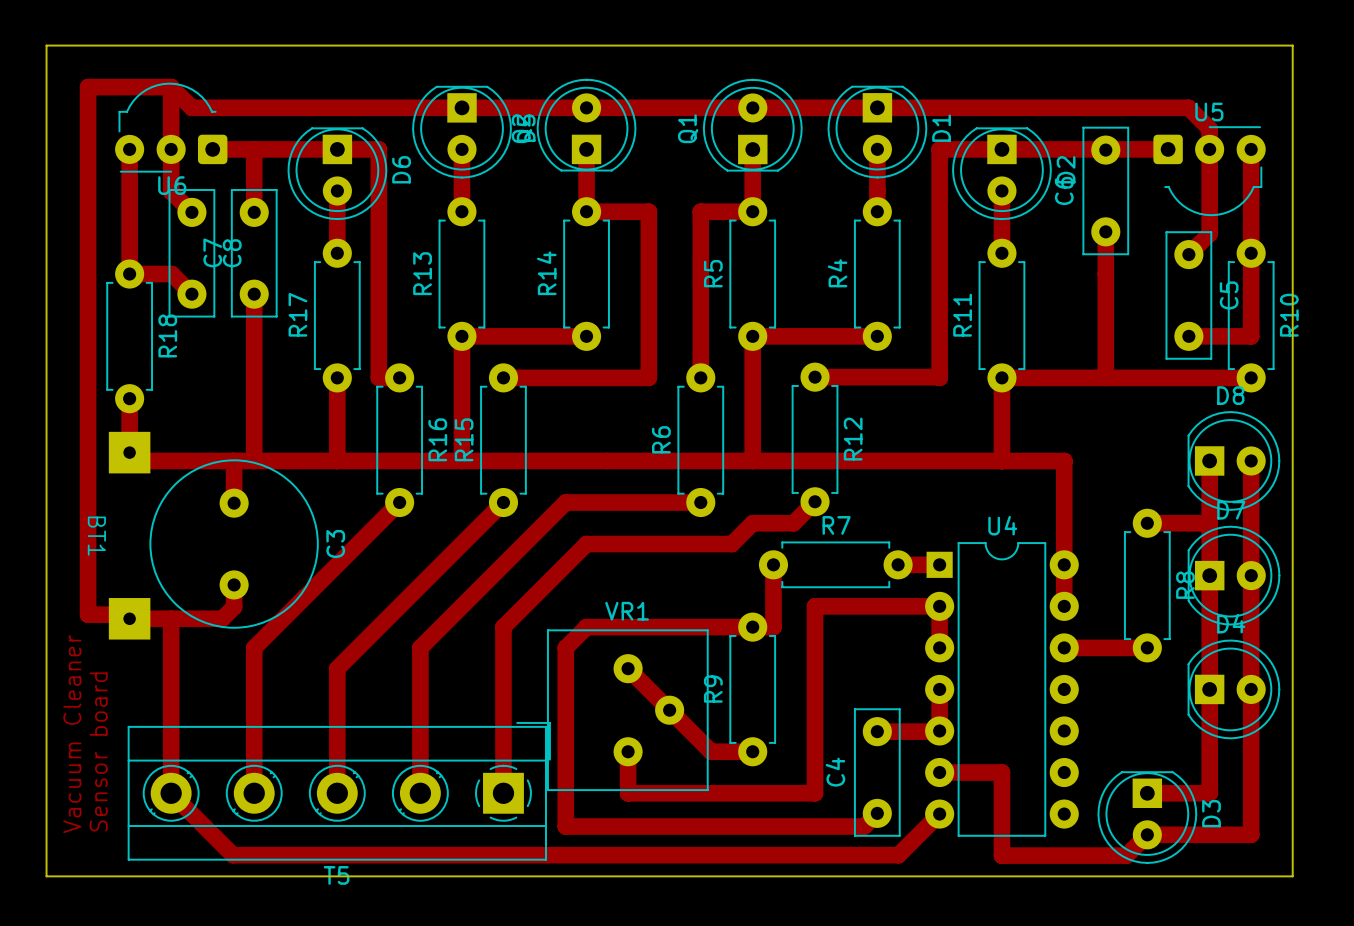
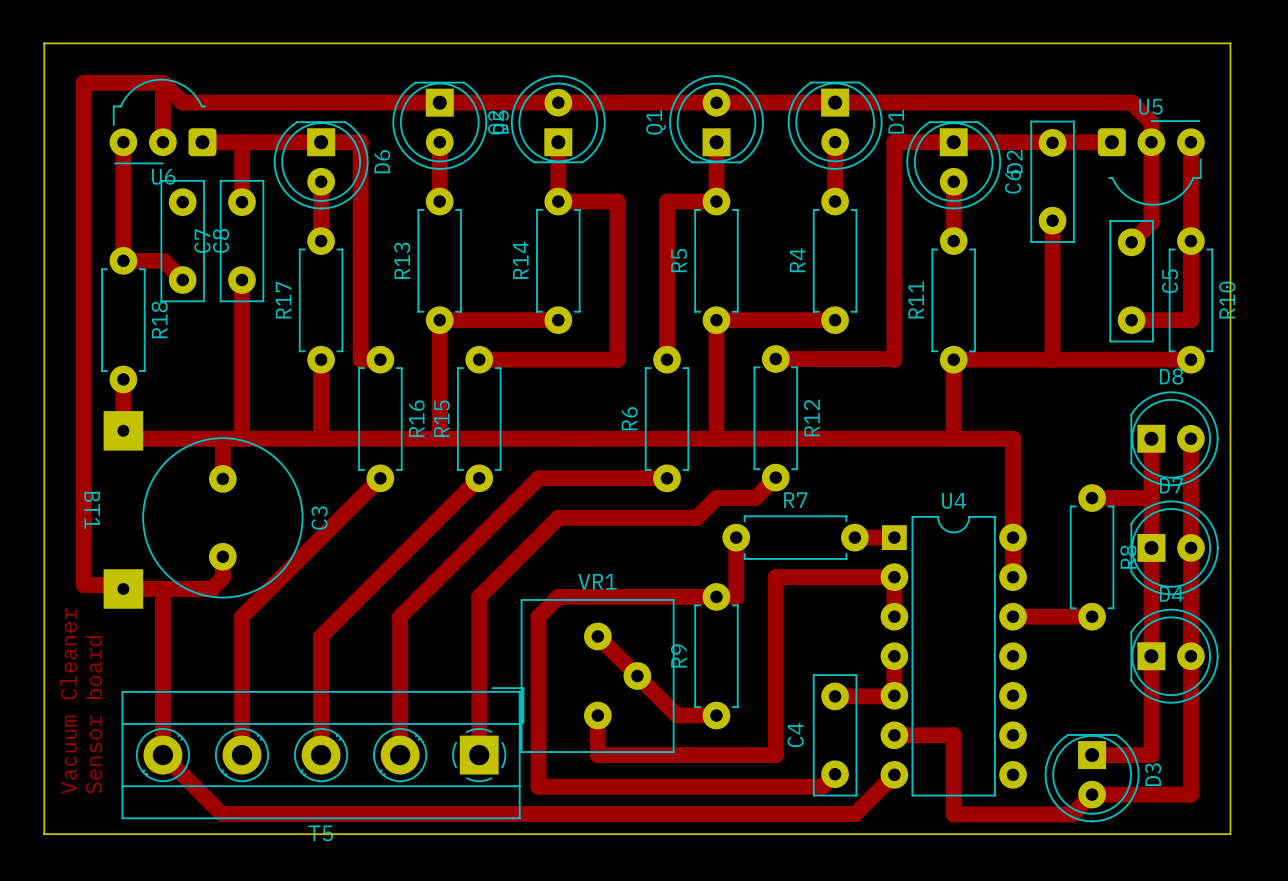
track: (171, 149) (171, 191) (191, 212) -> none

